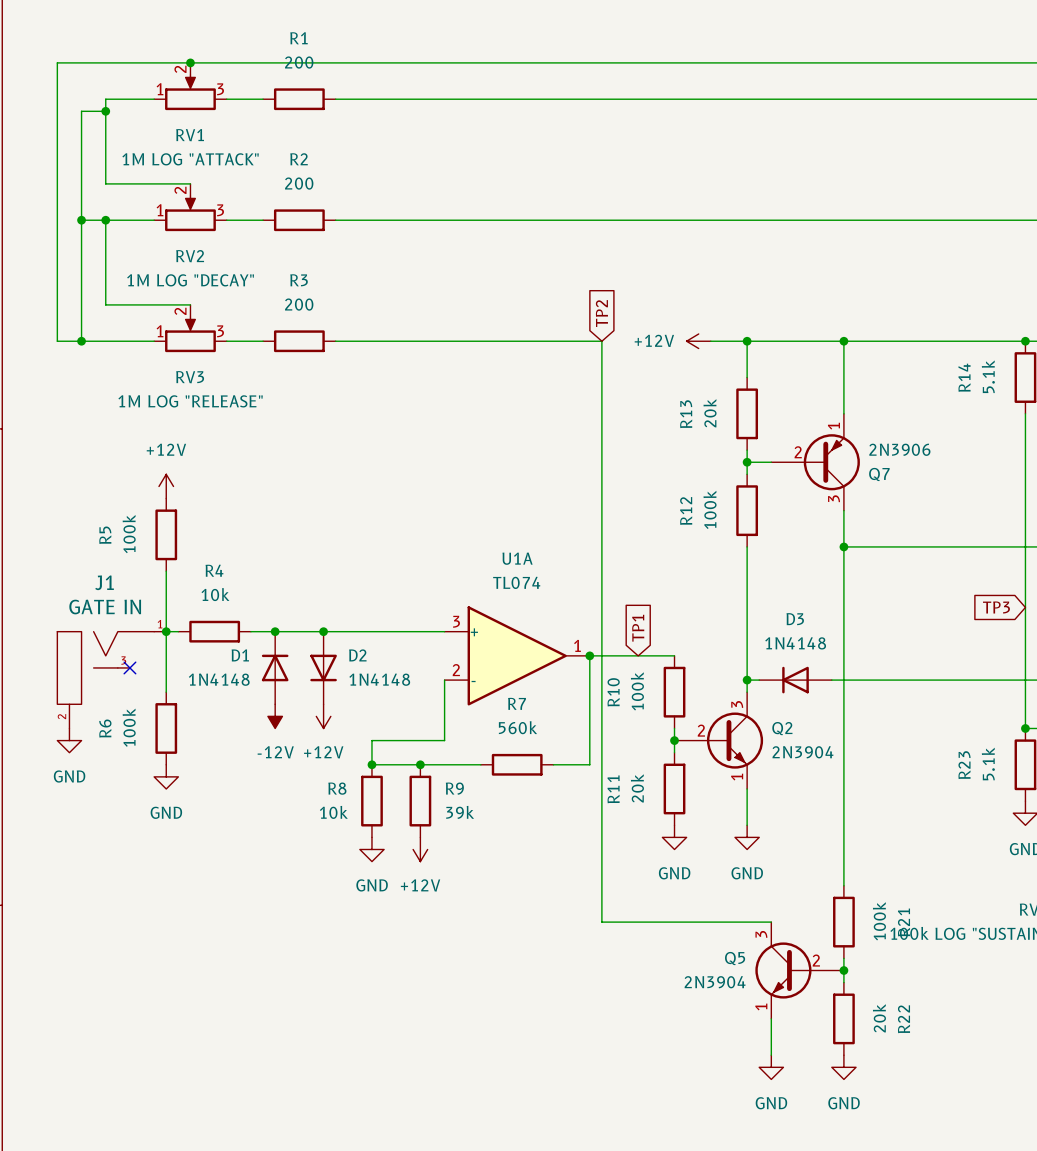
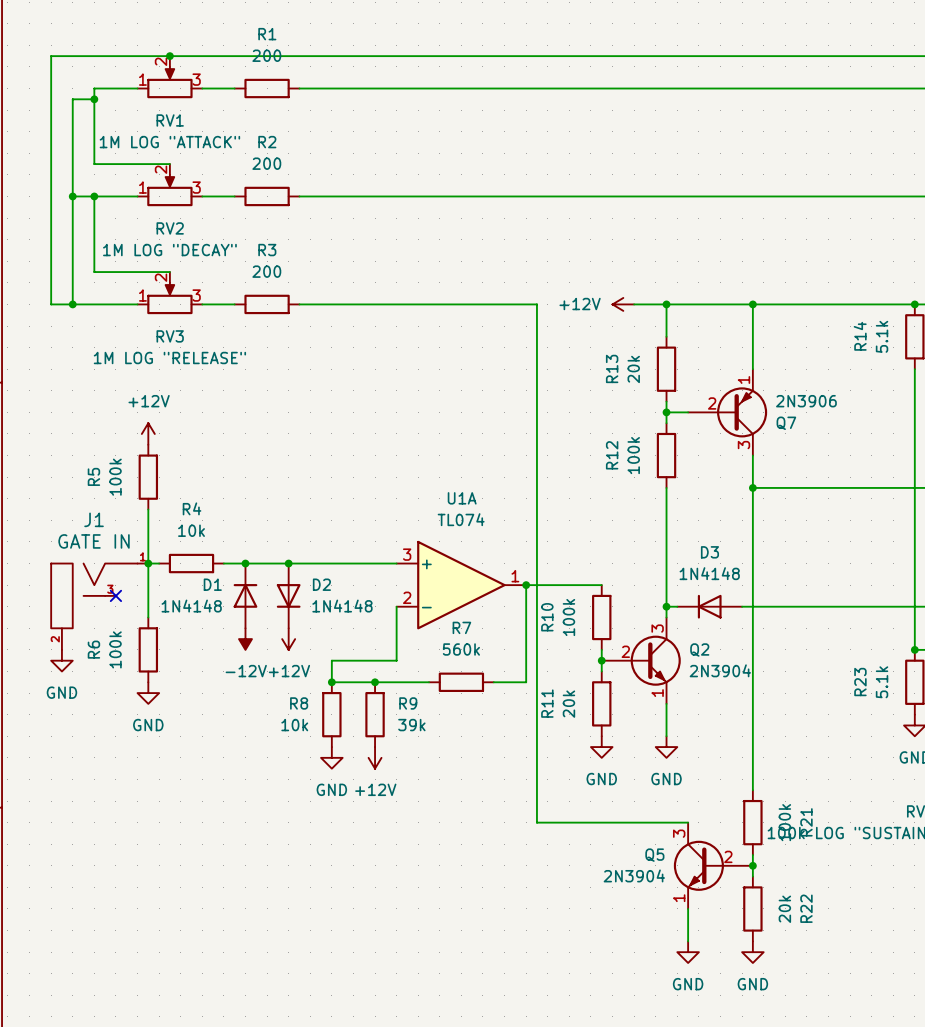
global label: TP2 (601, 313) -> none
global label: TP3 (996, 607) -> none
global label: TP1 (638, 628) -> none

